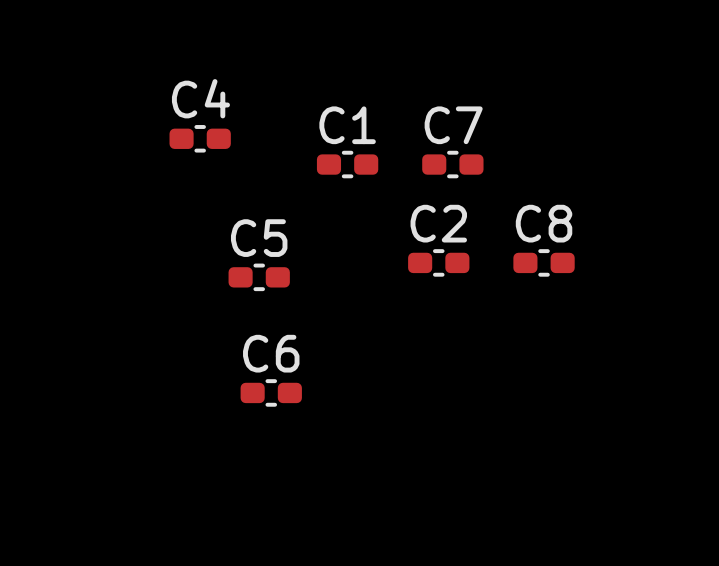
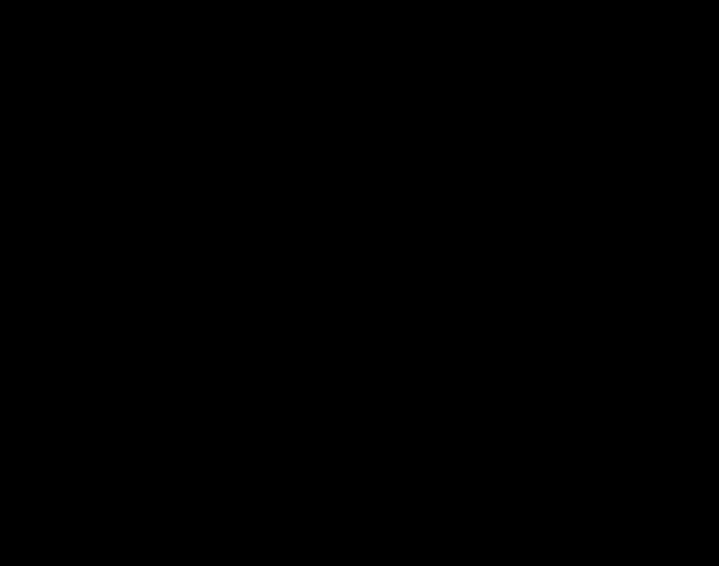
C4: (200, 138) -> none
C1: (347, 164) -> none
C7: (452, 164) -> none
C2: (438, 262) -> none
C8: (544, 262) -> none
C5: (259, 277) -> none
C6: (271, 392) -> none

